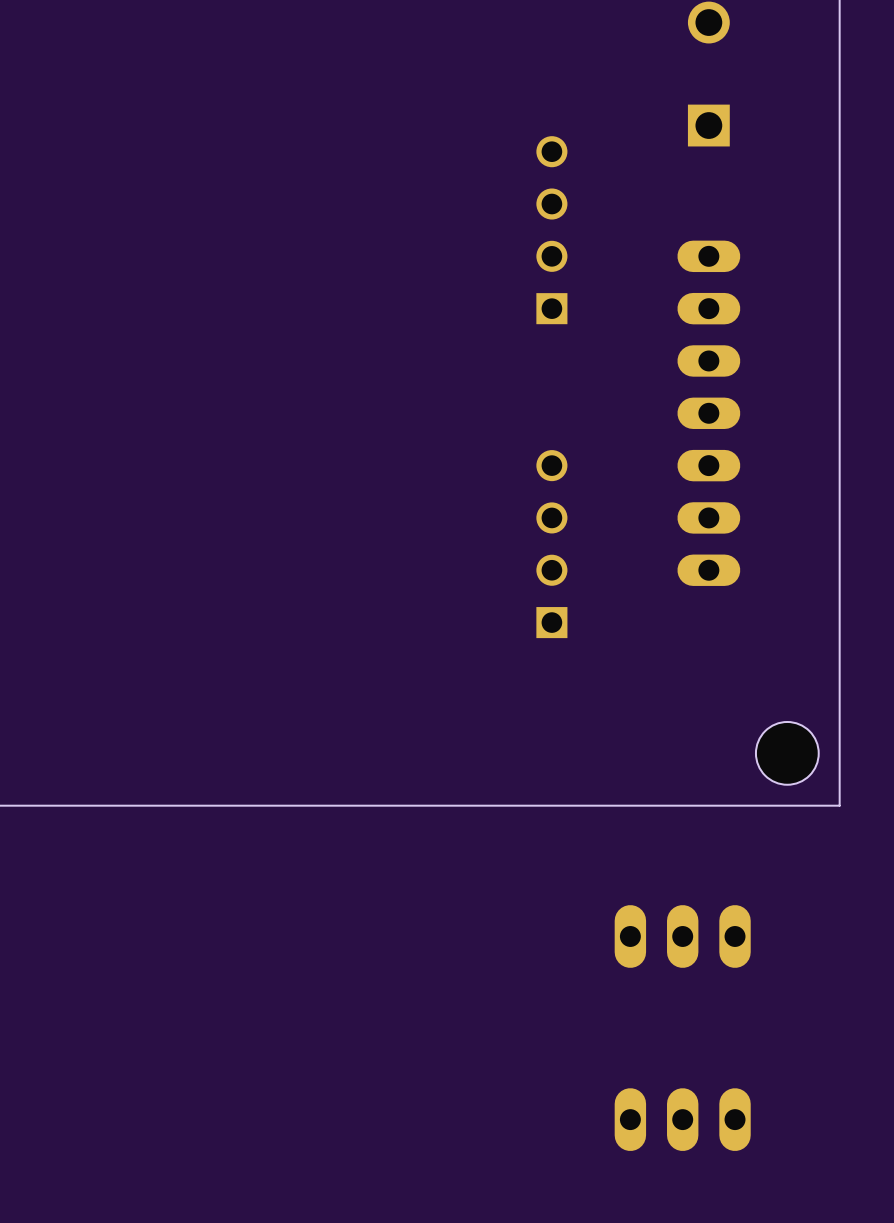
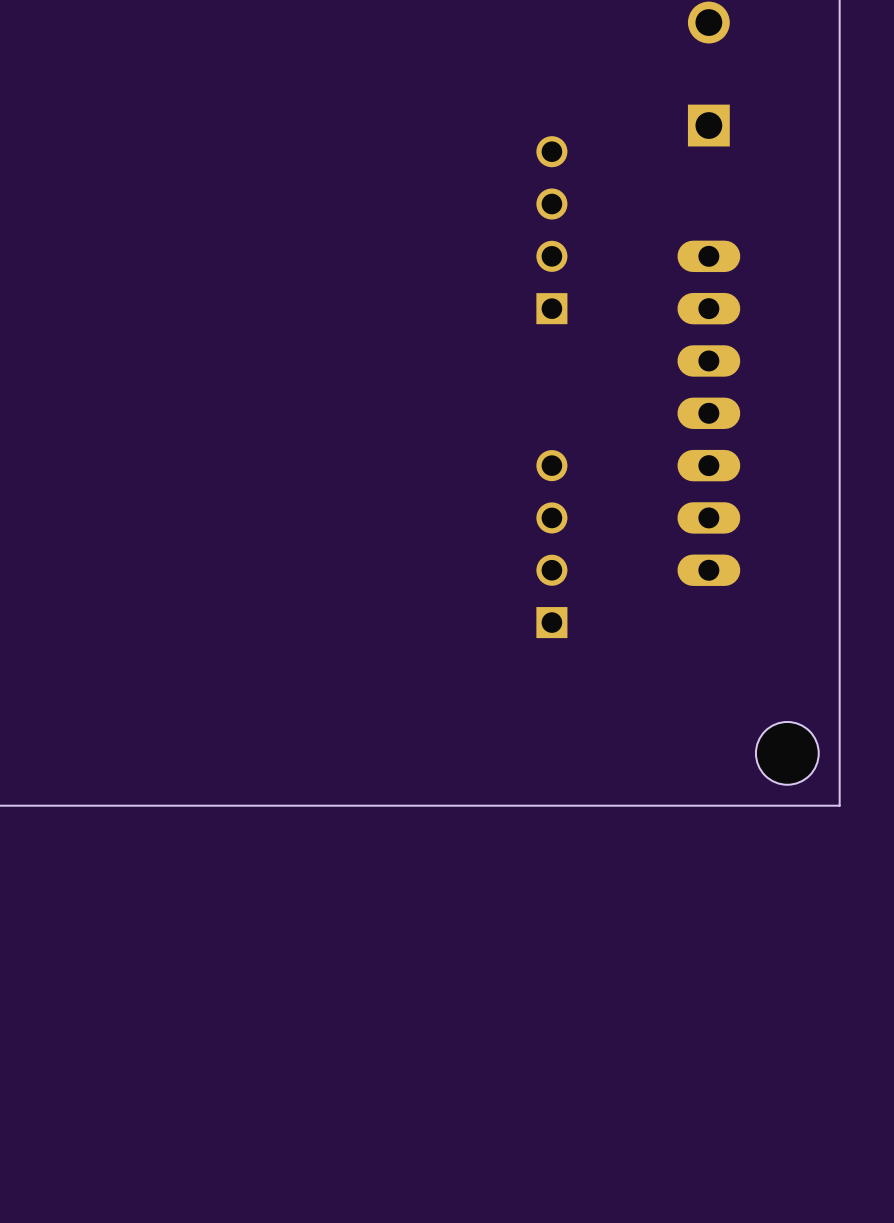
part: (682, 936) -> none
part: (682, 1119) -> none

